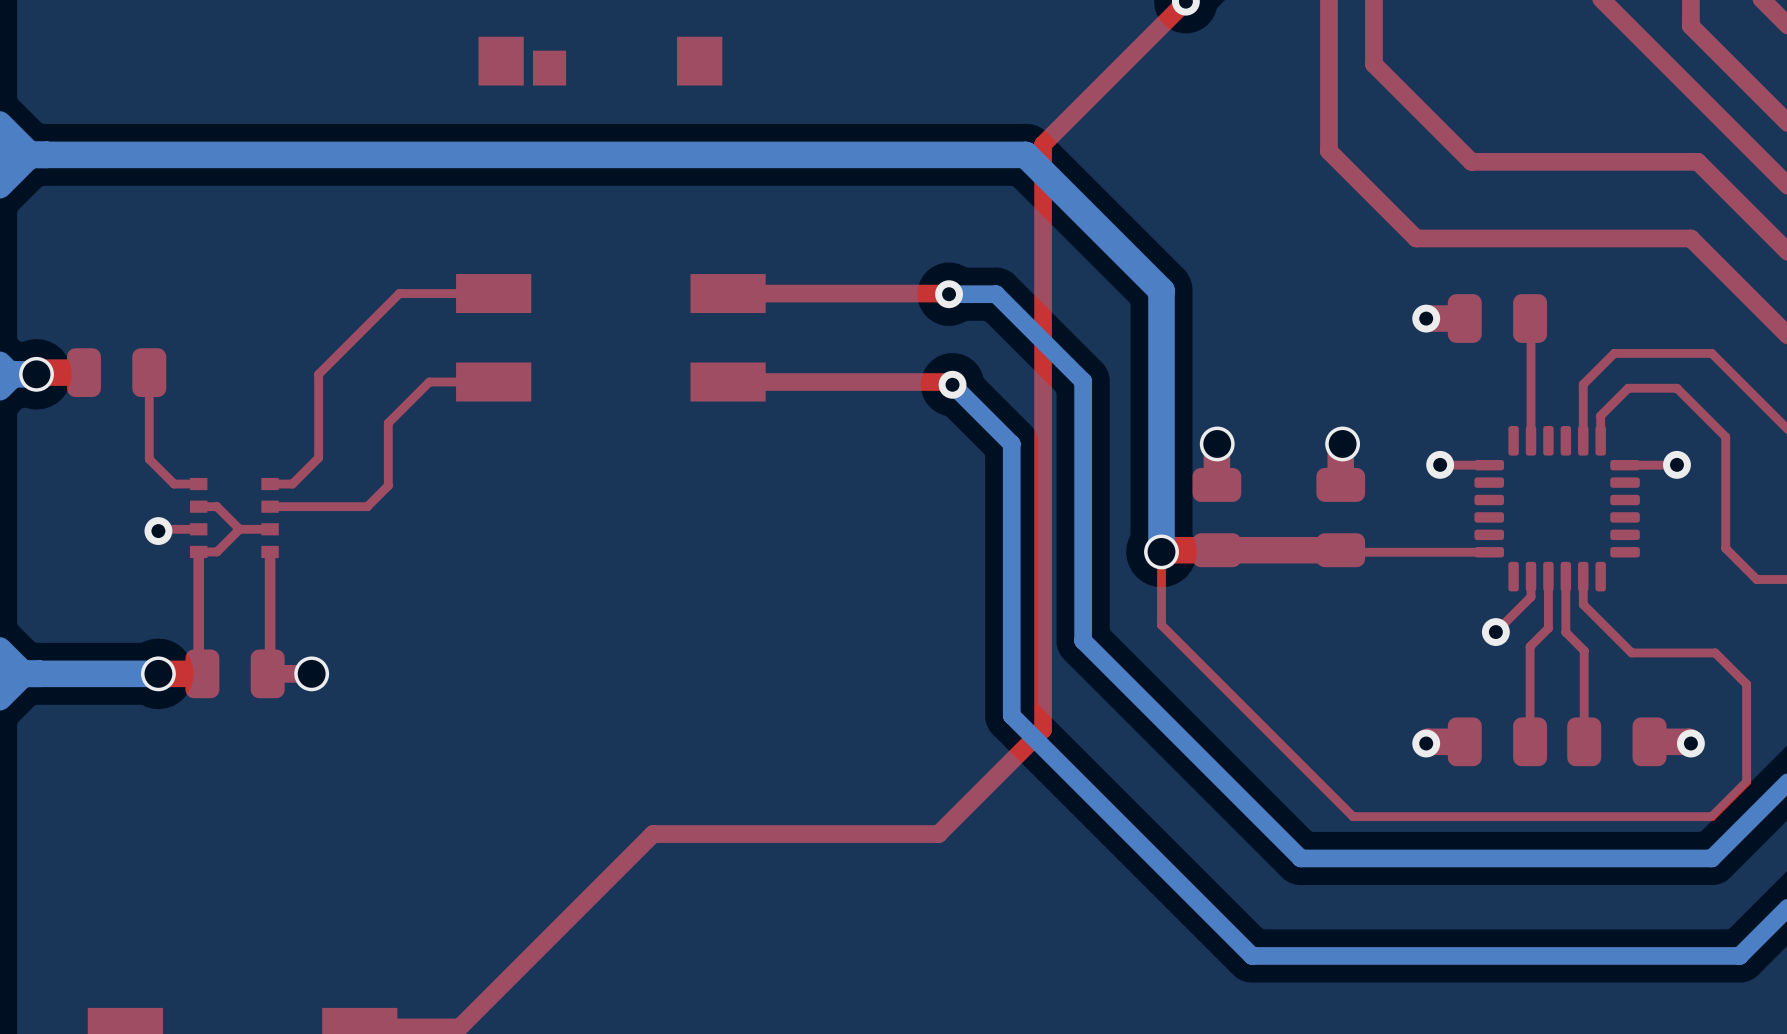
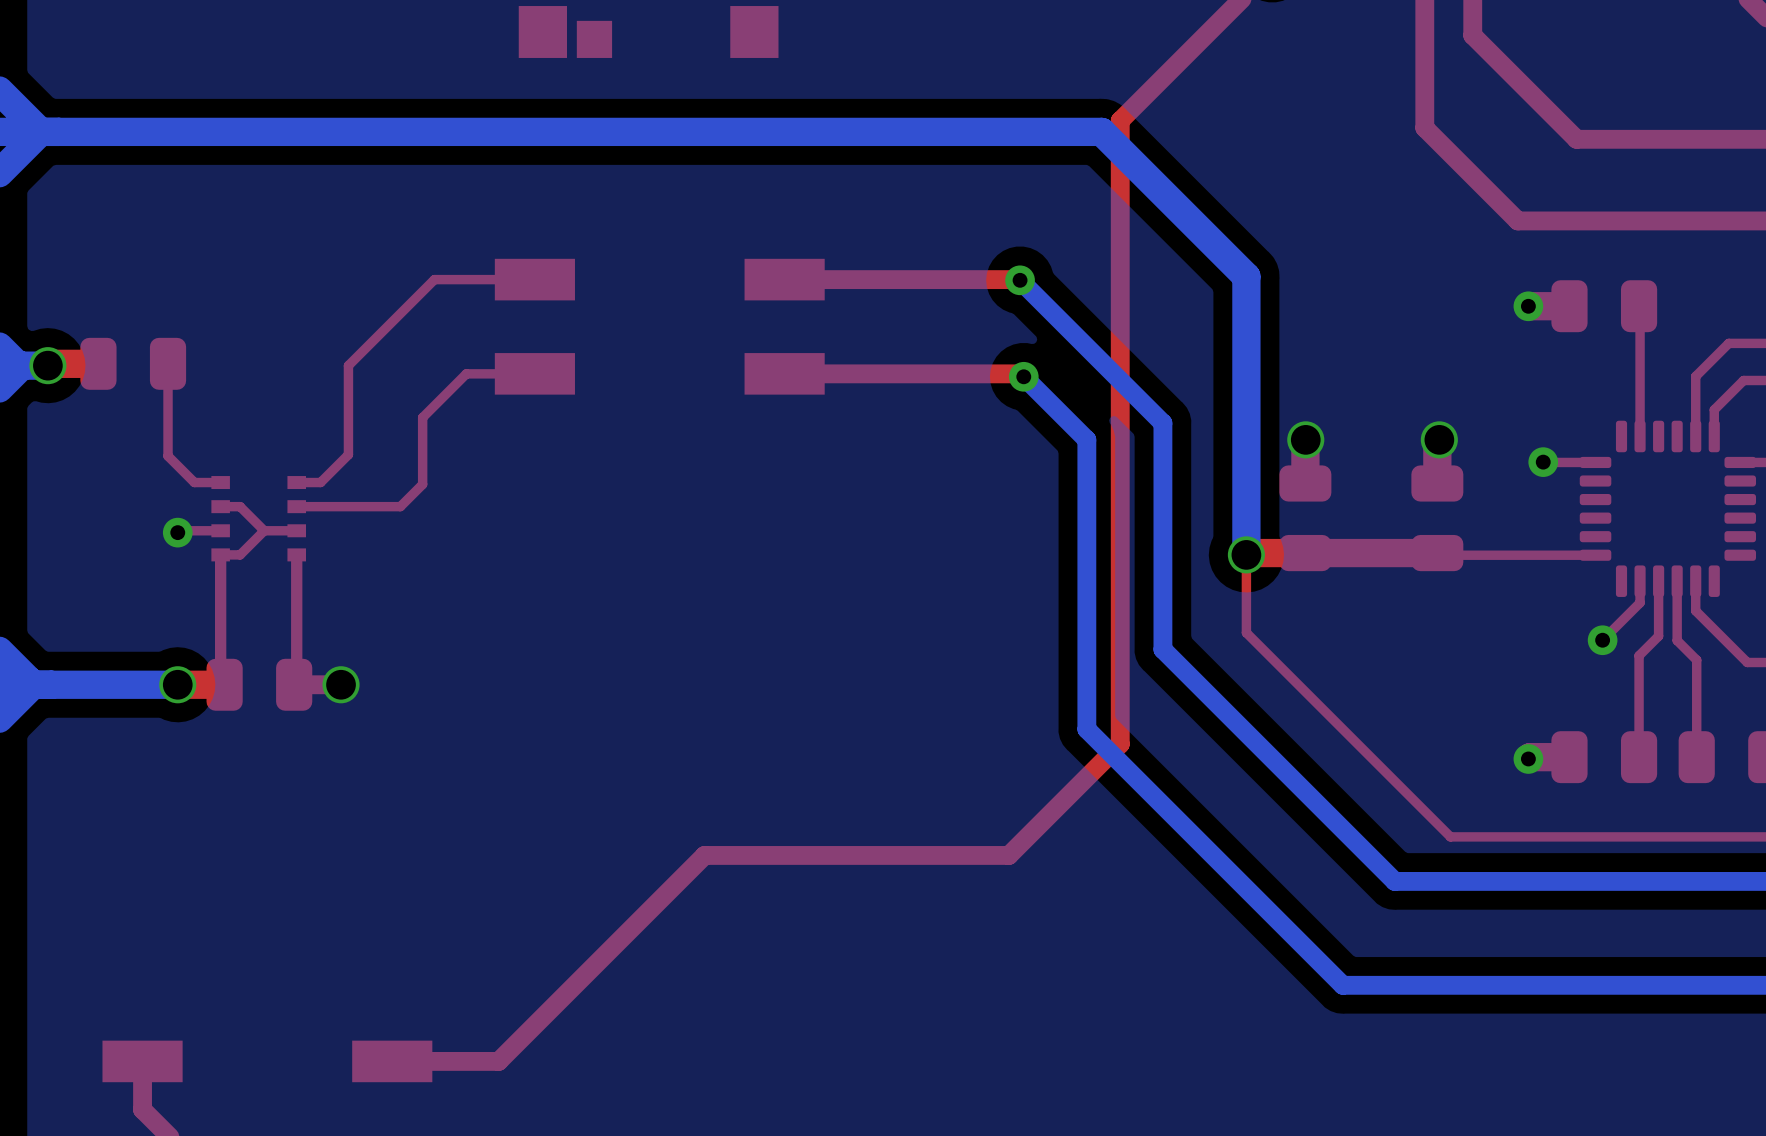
bottom track: (949, 294) (996, 294) (1083, 381) (1083, 428) -> (1020, 280) (1162, 423)

